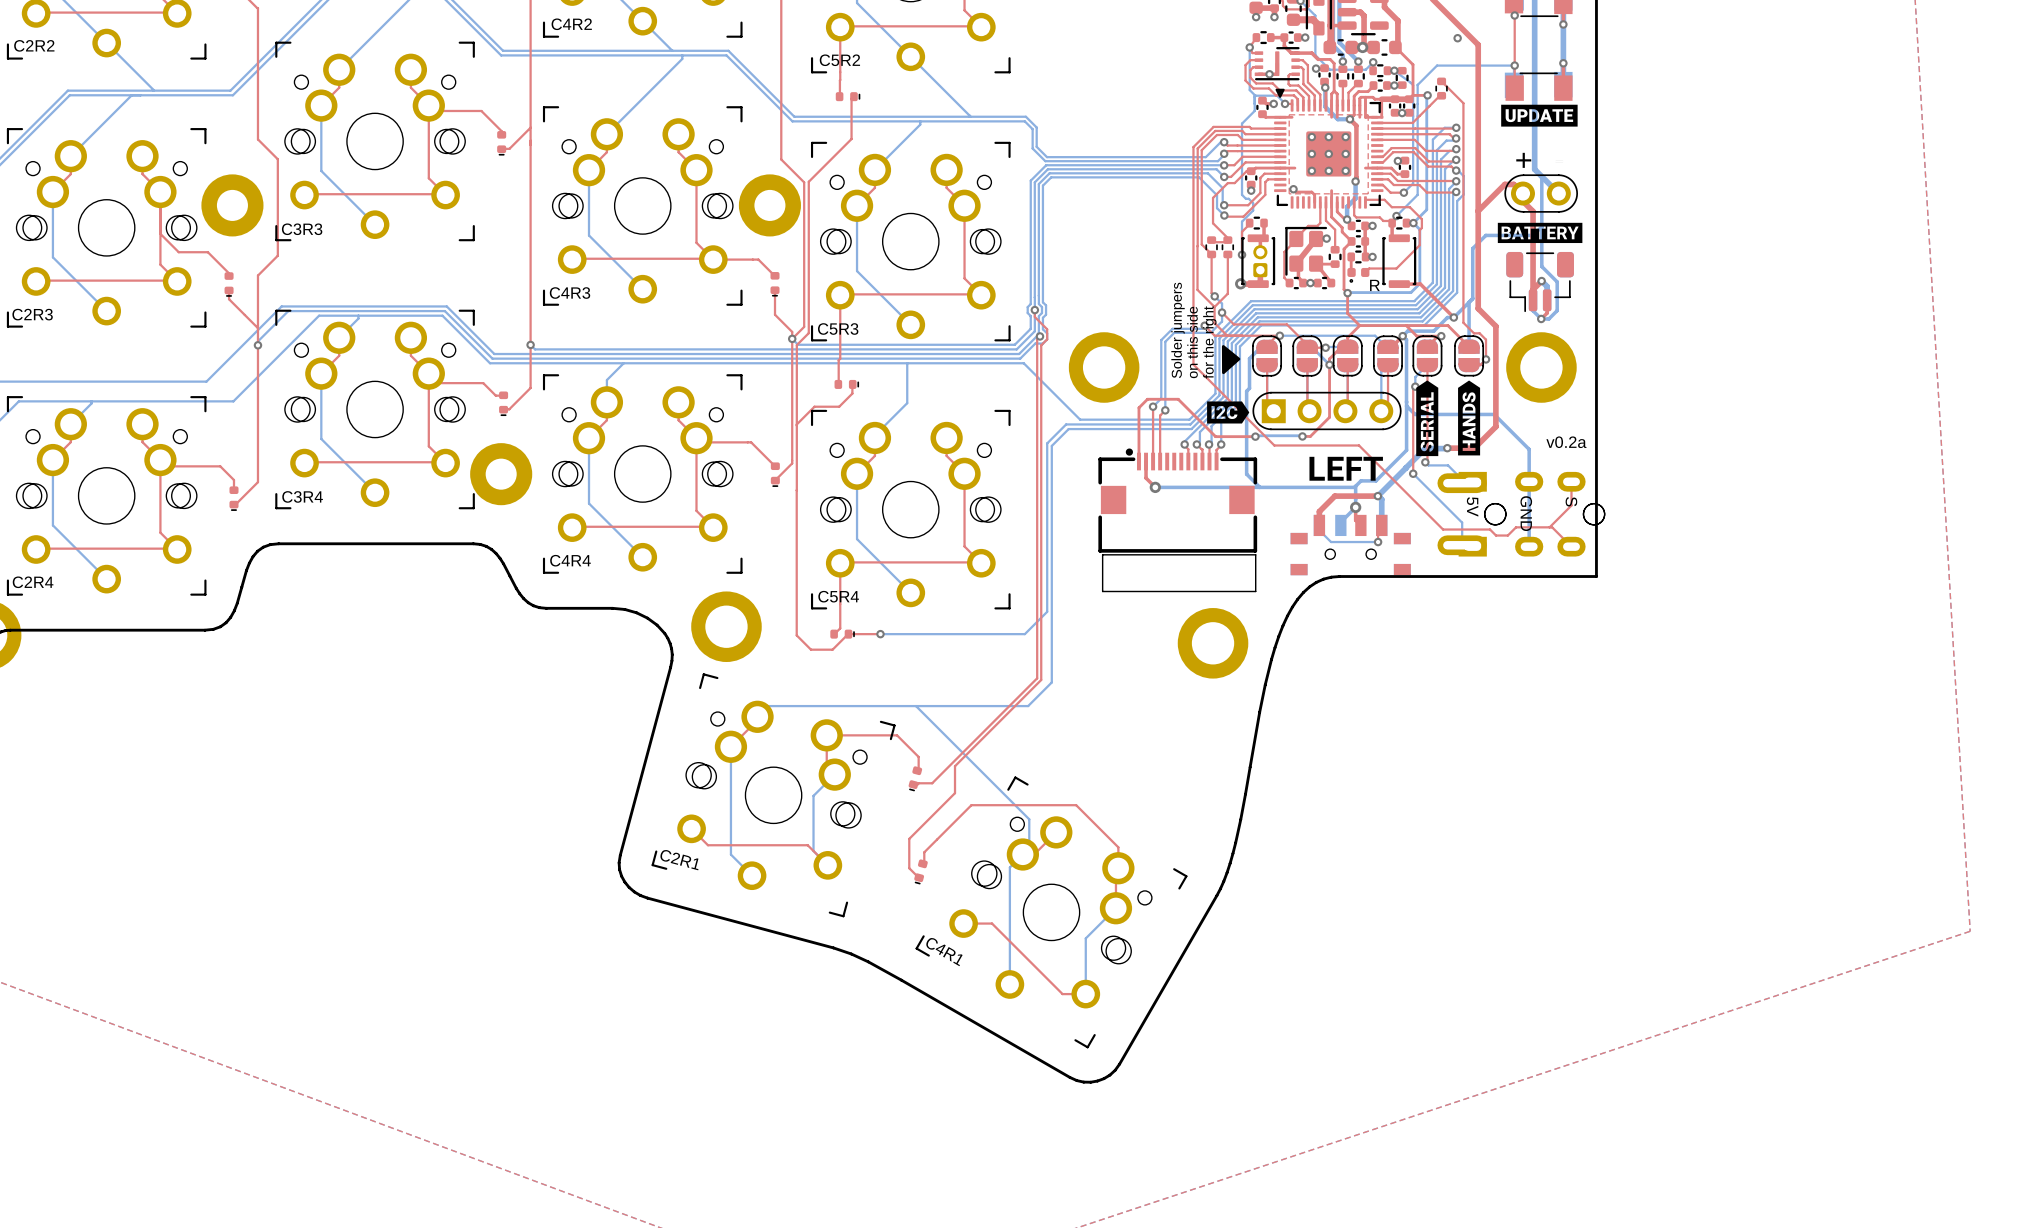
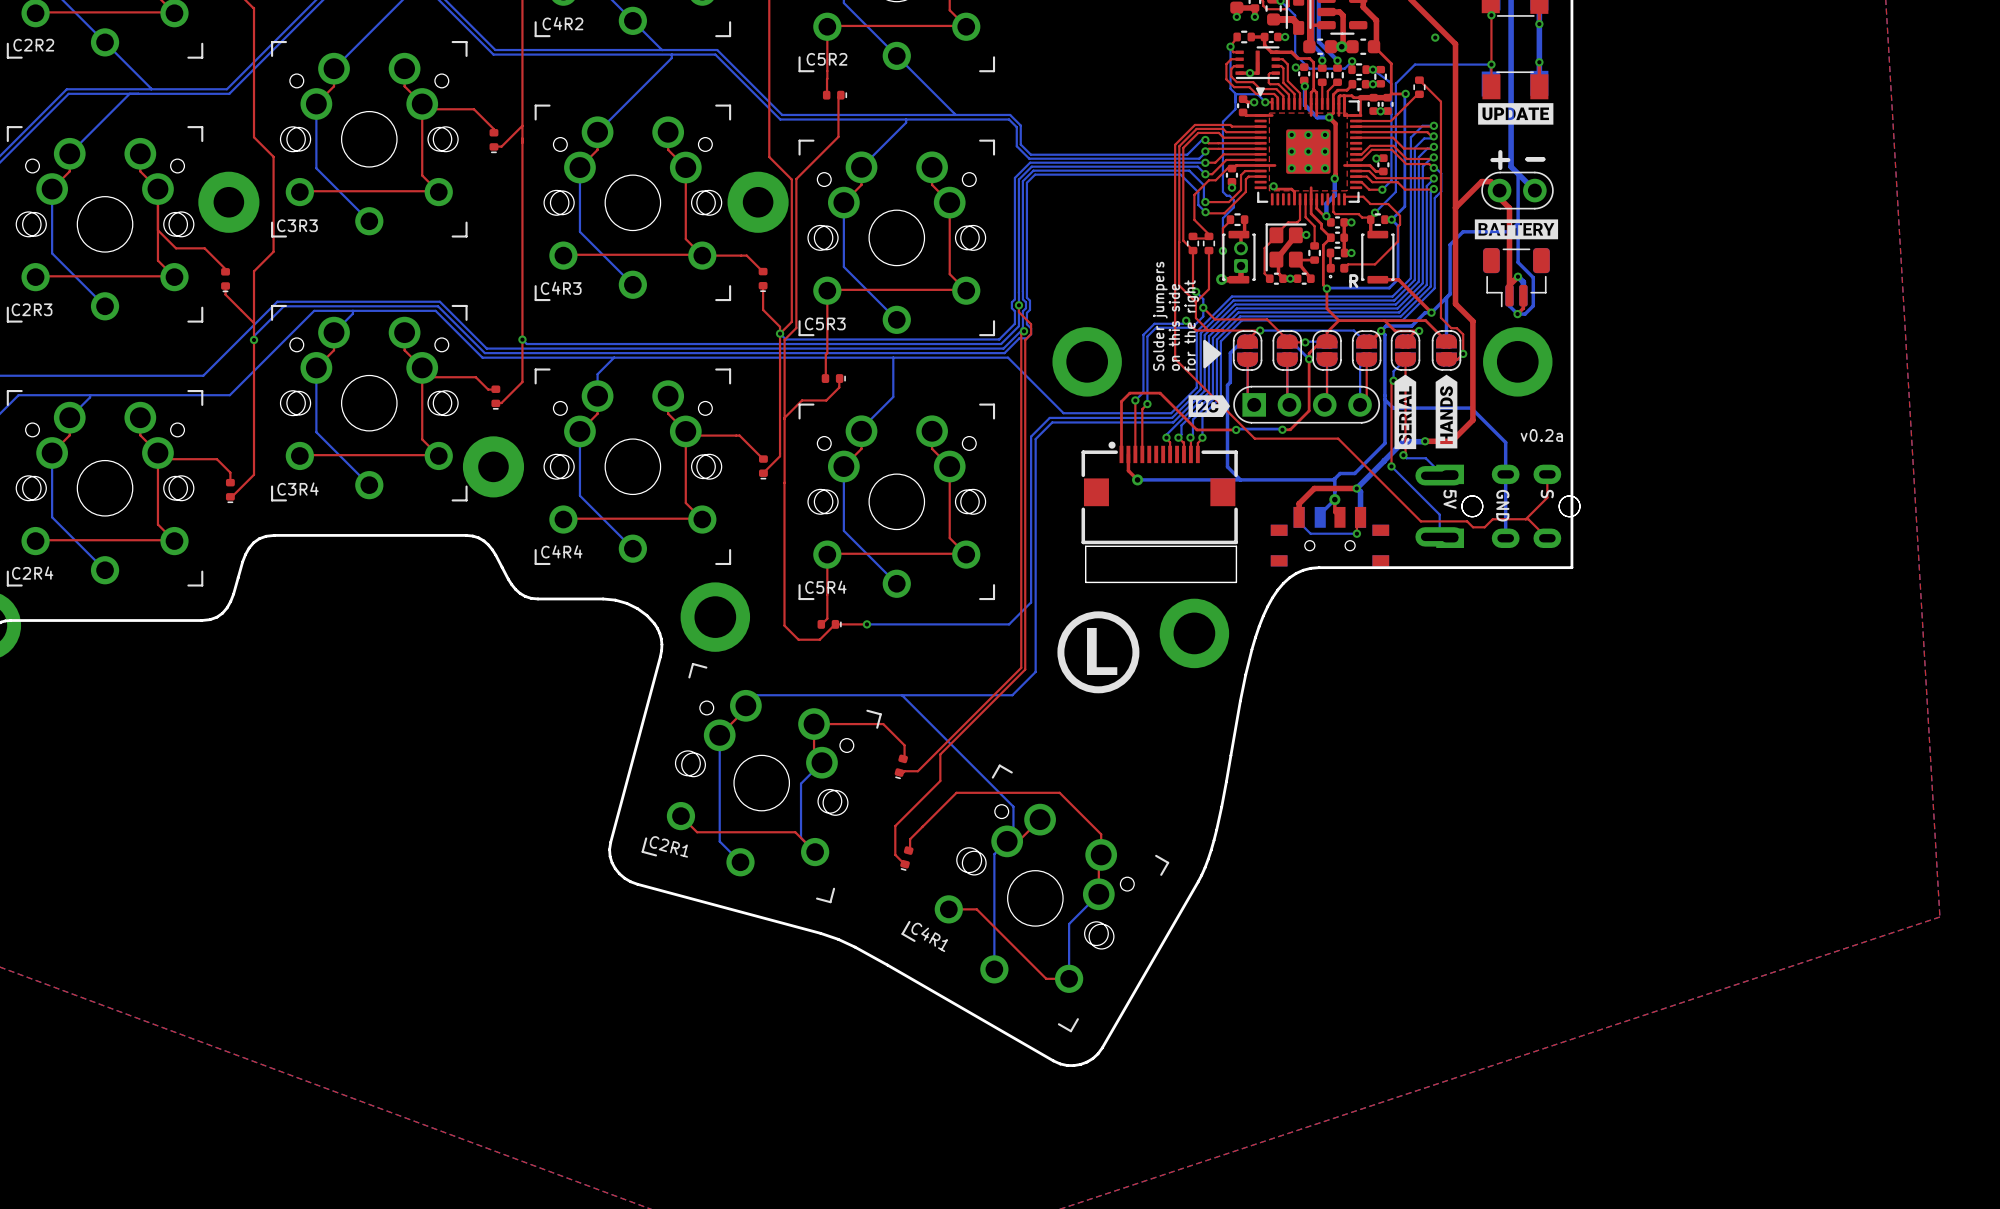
drawing: [1309, 456, 1383, 481] -> none
drawing: none -> [1057, 611, 1140, 694]

